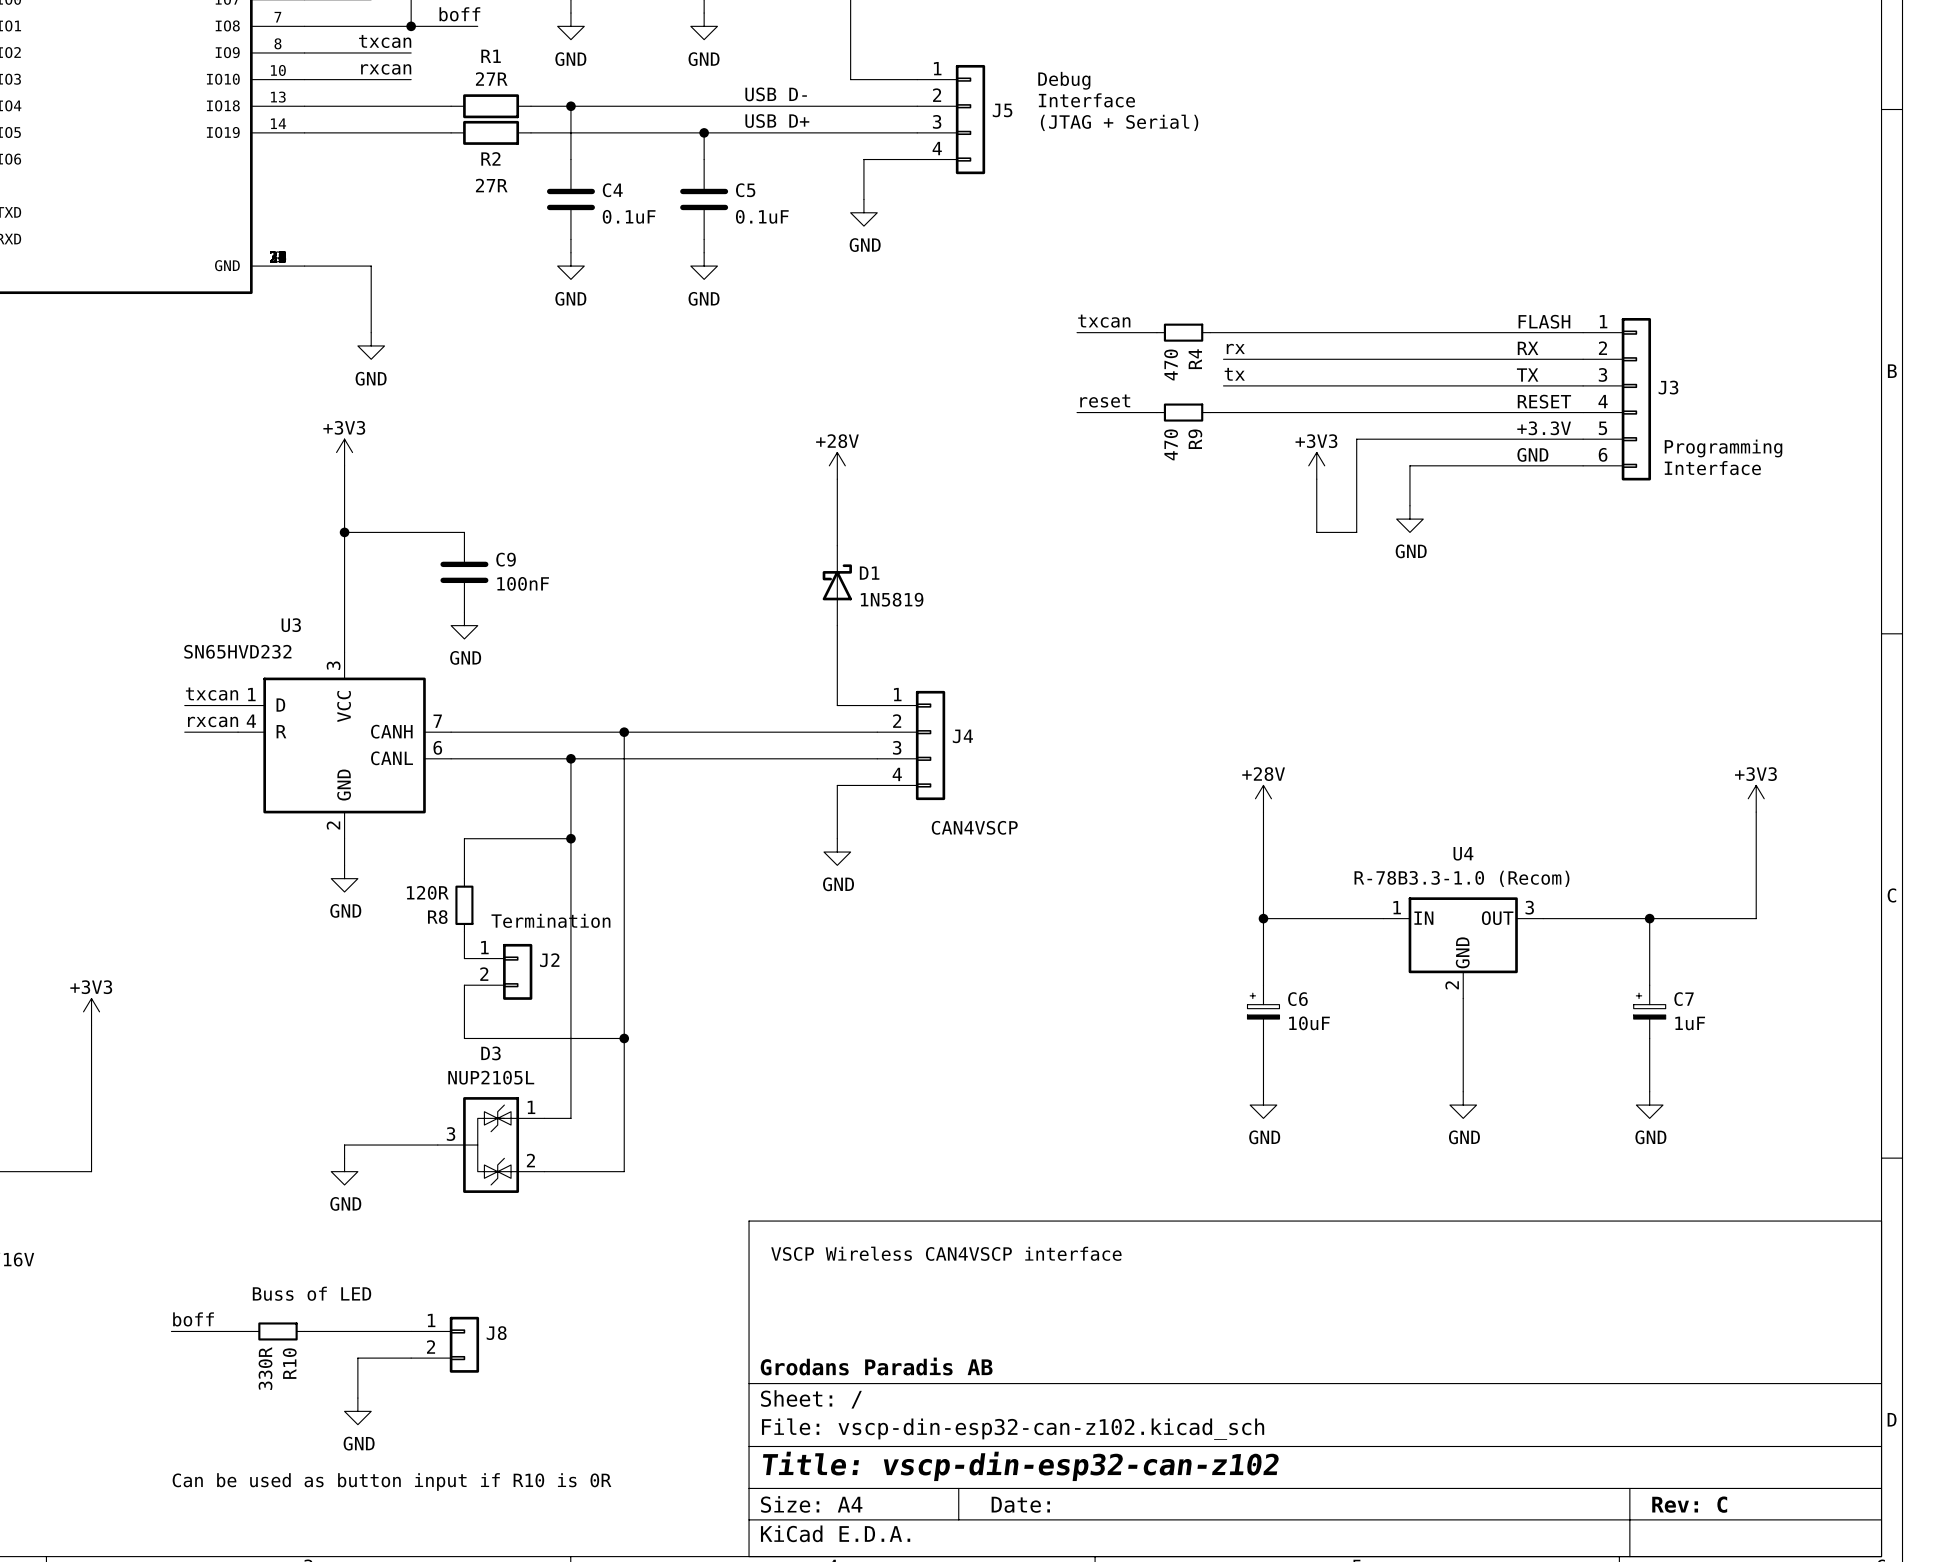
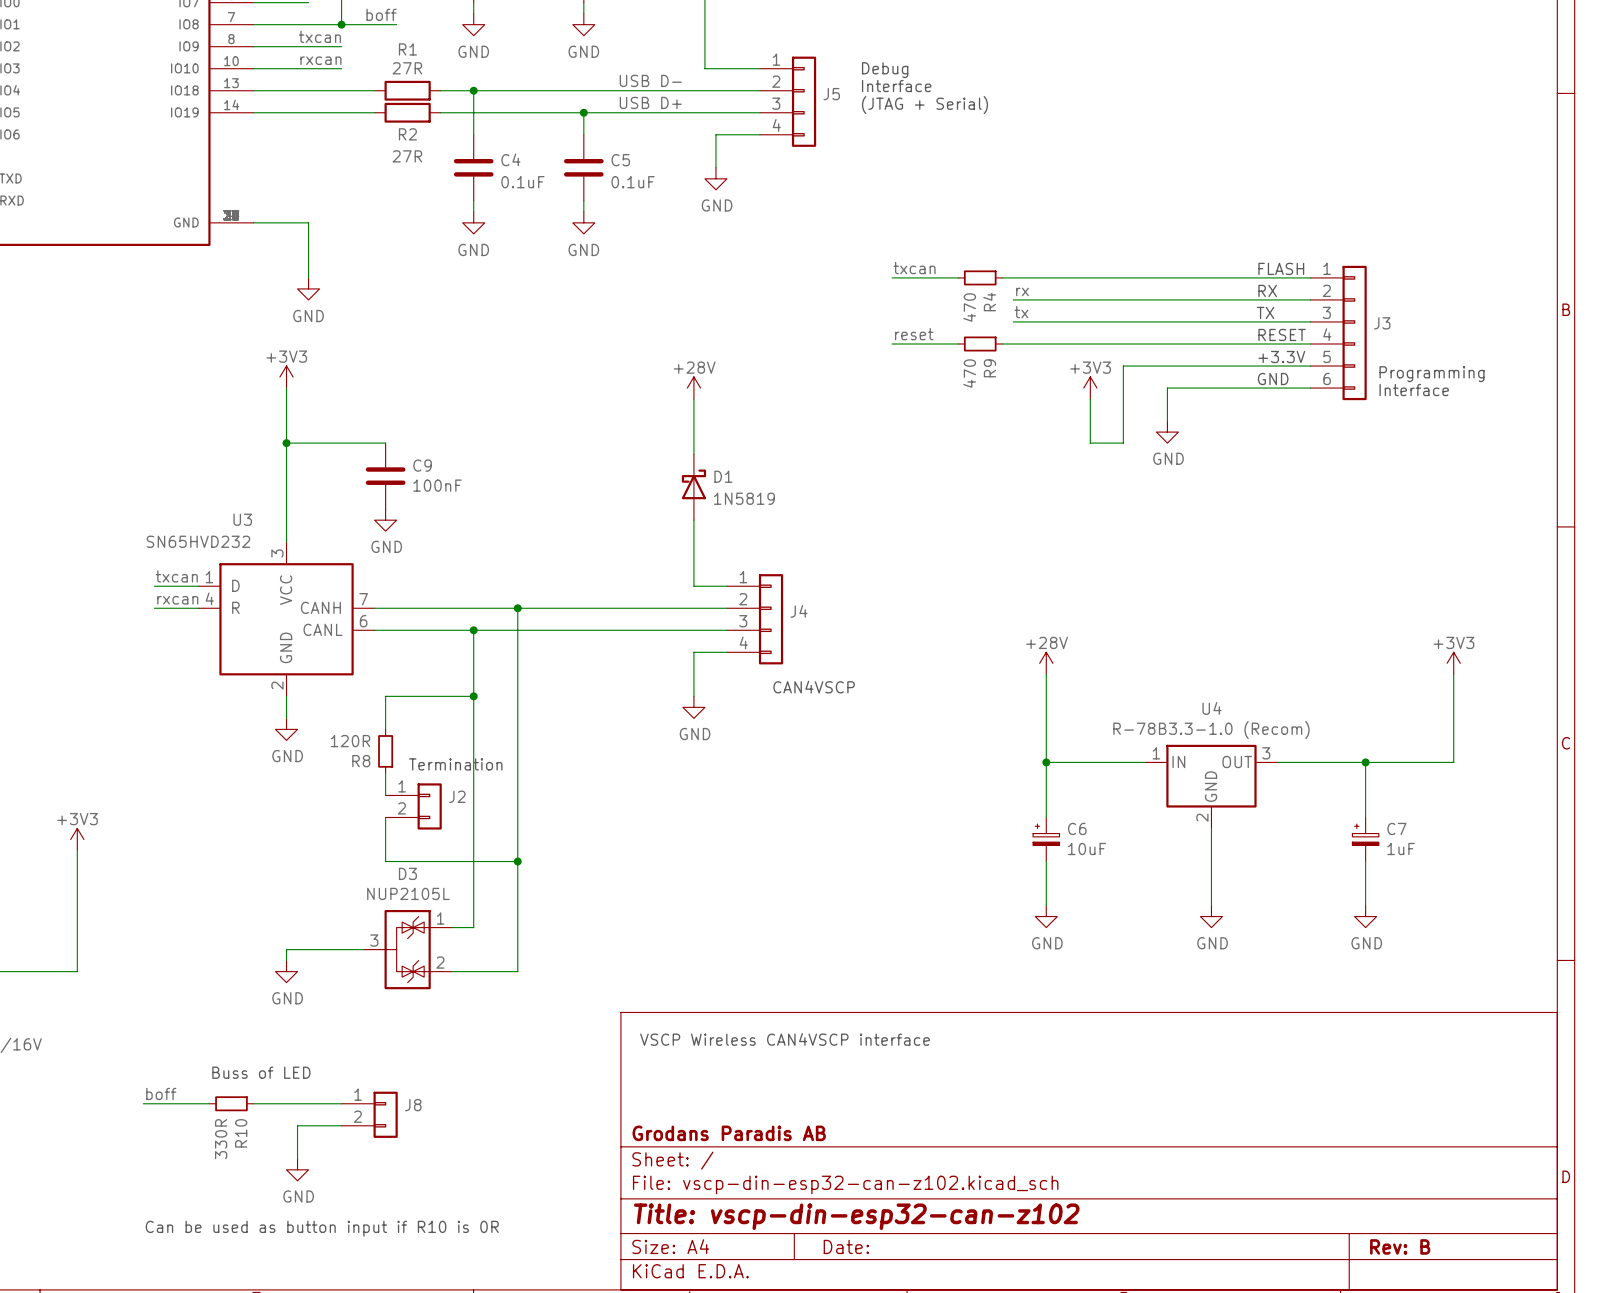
title block: Rev: C (1689, 1504) -> Rev: B (1400, 1246)

